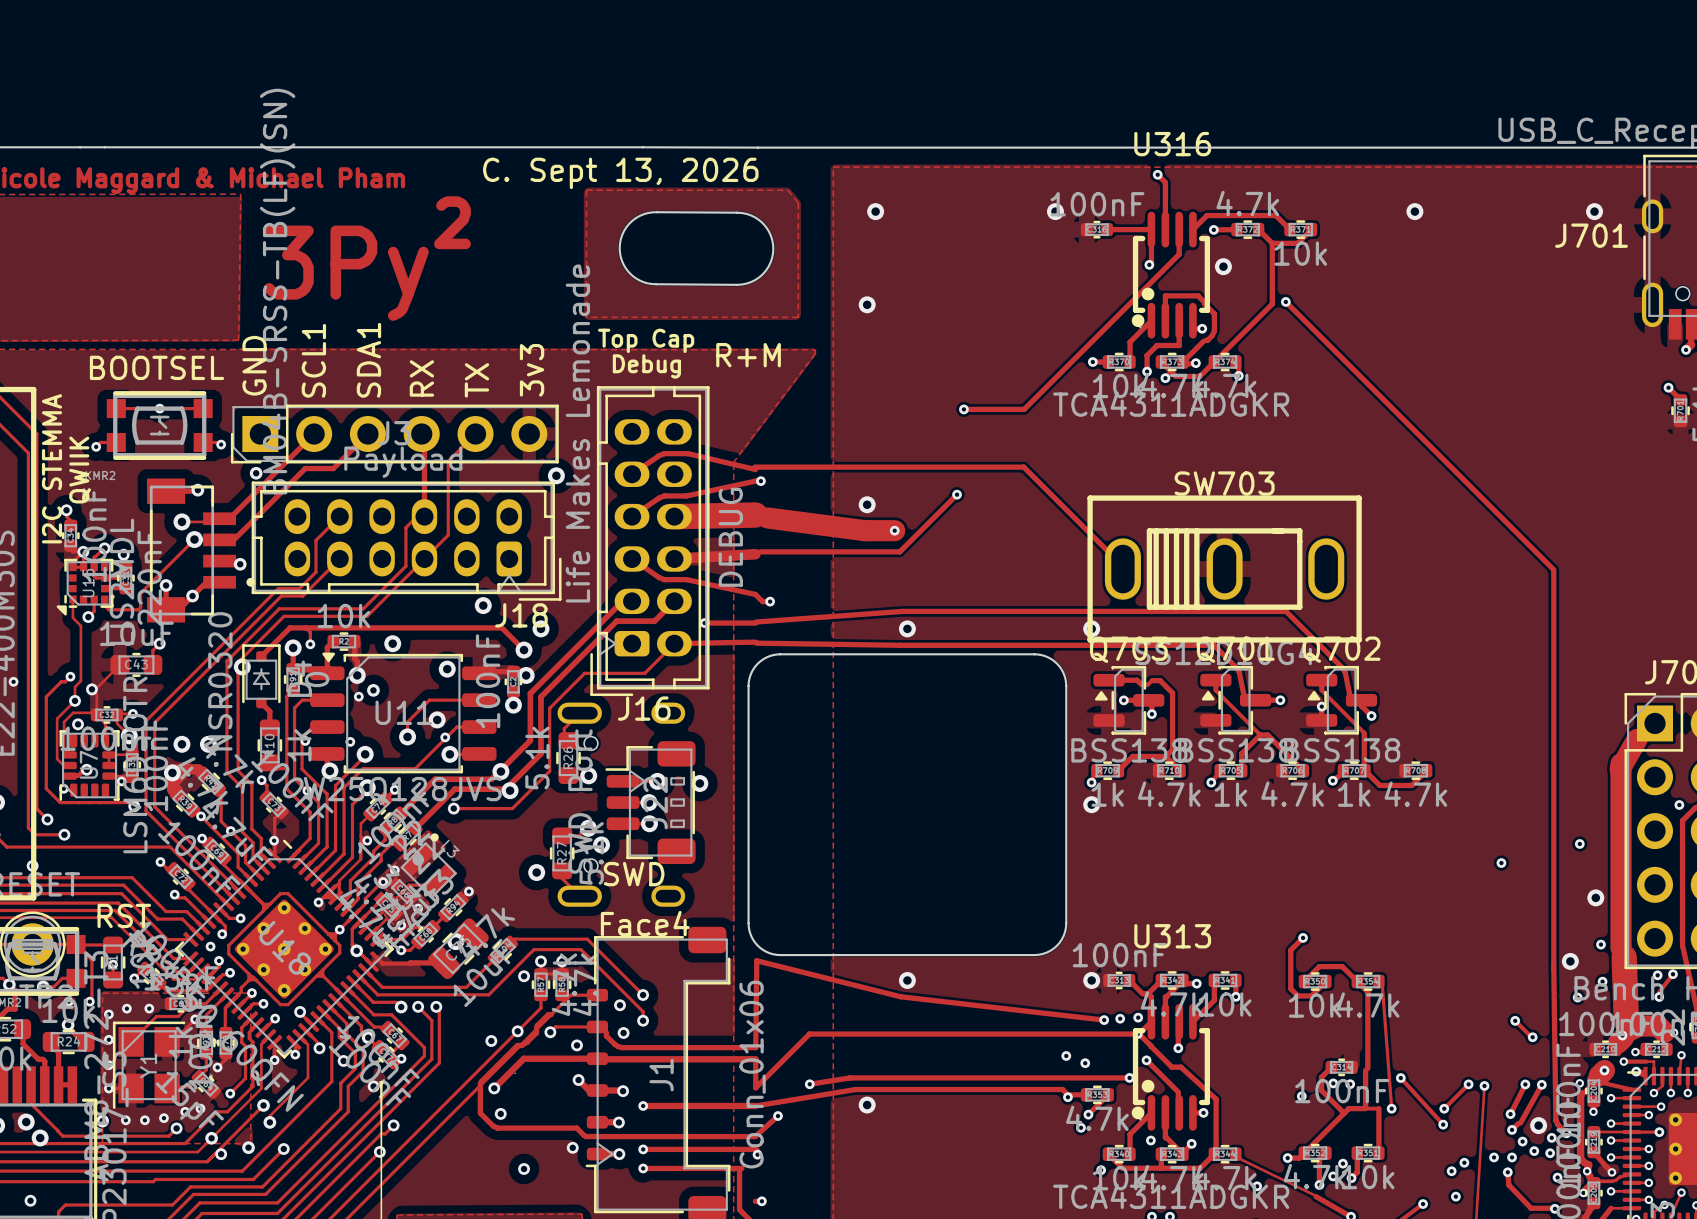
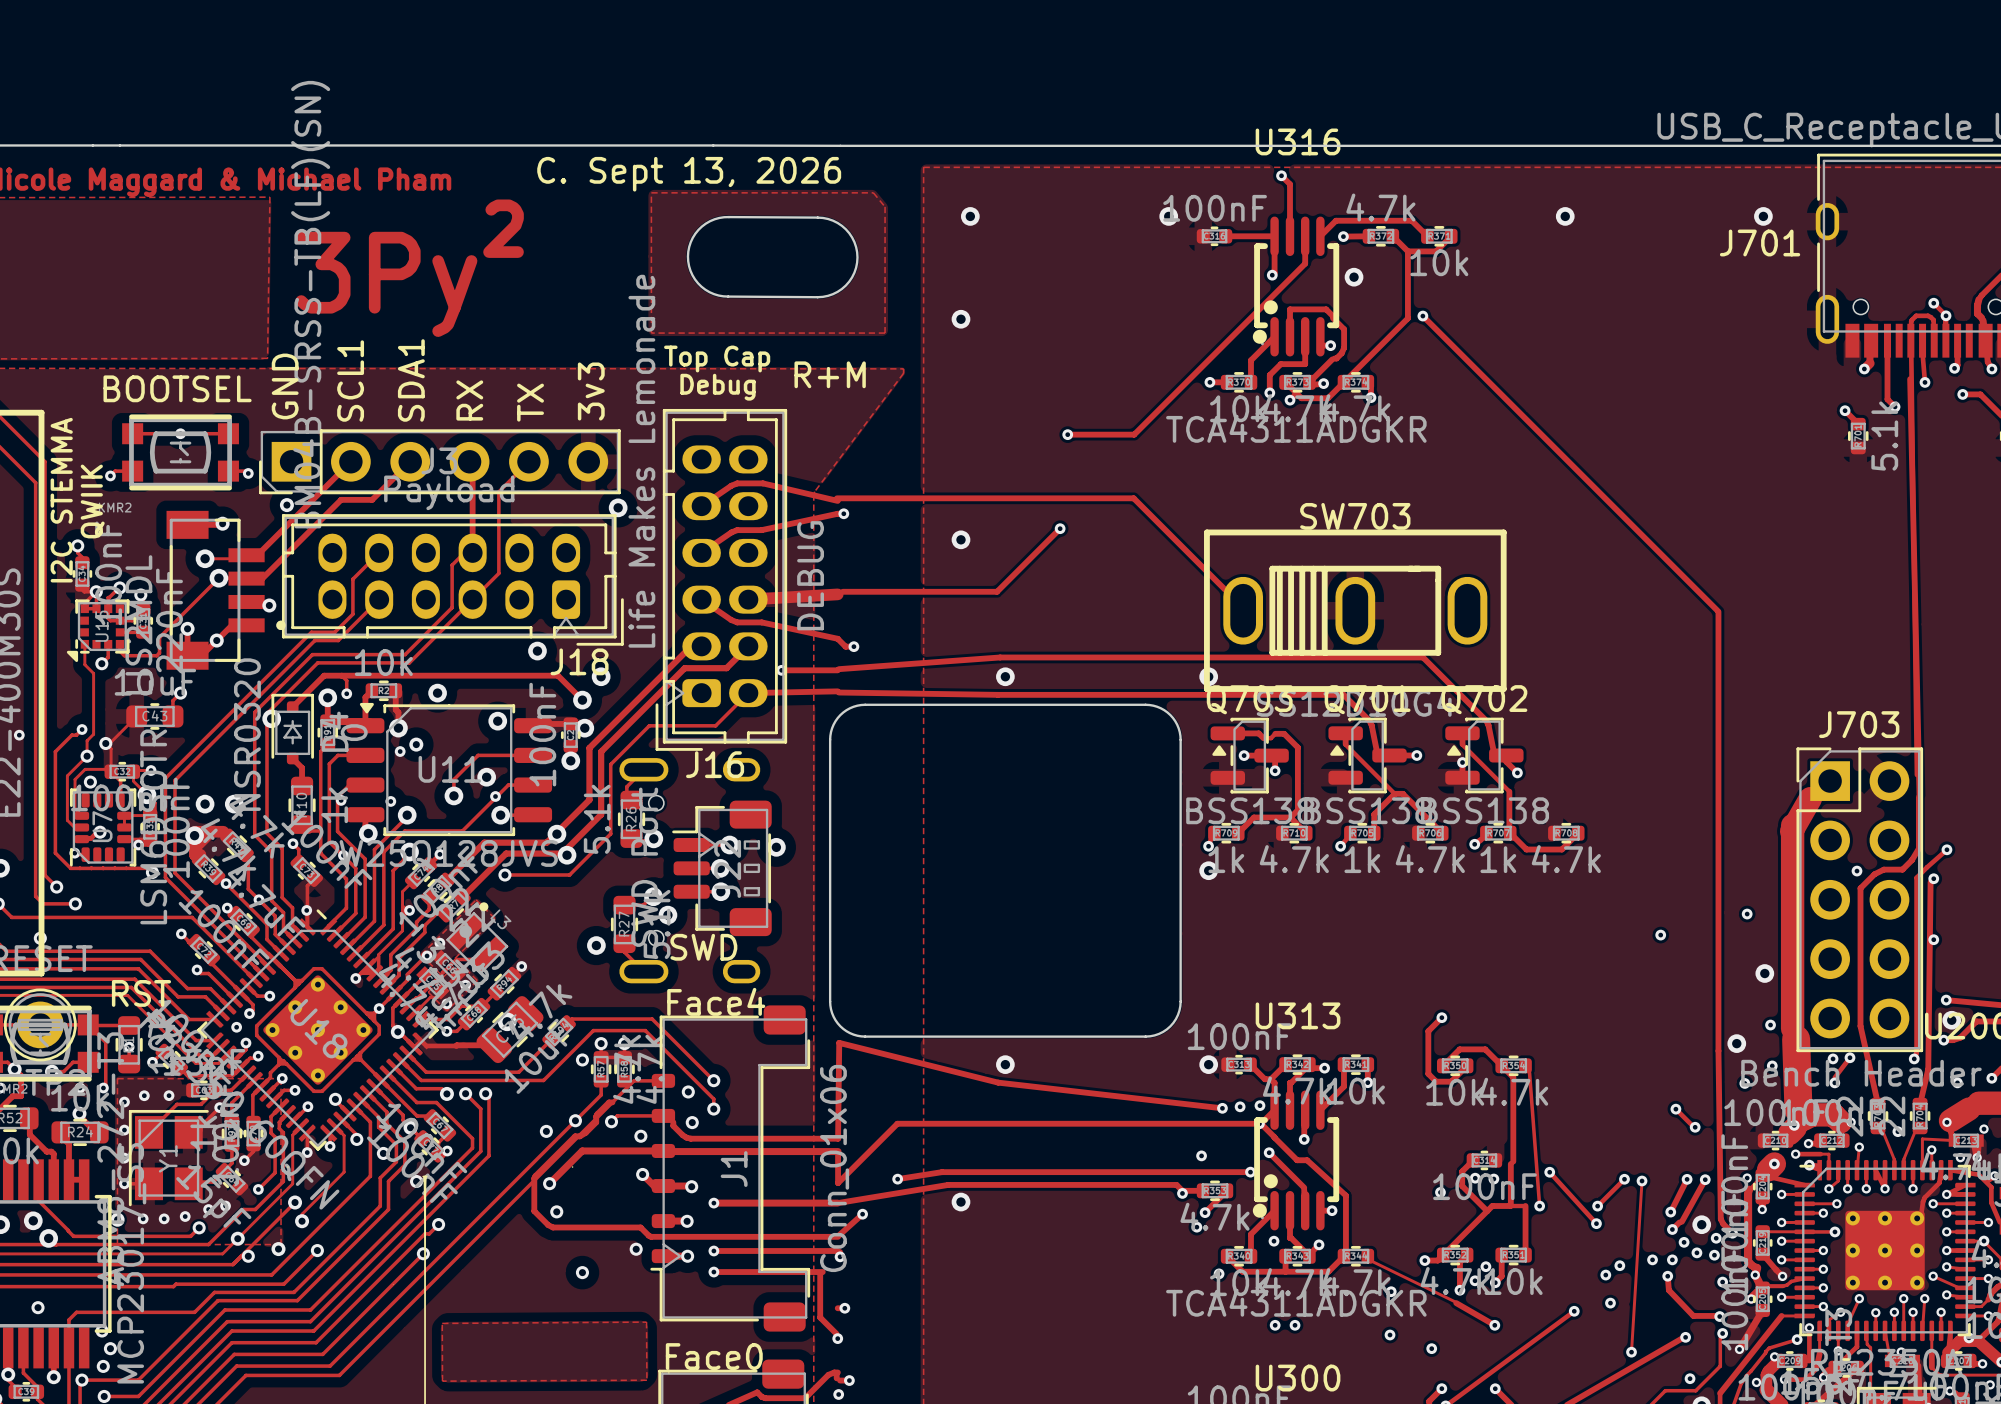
track: (755, 515) (674, 516) -> none
track: (767, 517) (865, 530) (894, 530) -> none
via: (894, 530) -> none
via: (1066, 1055) -> none

